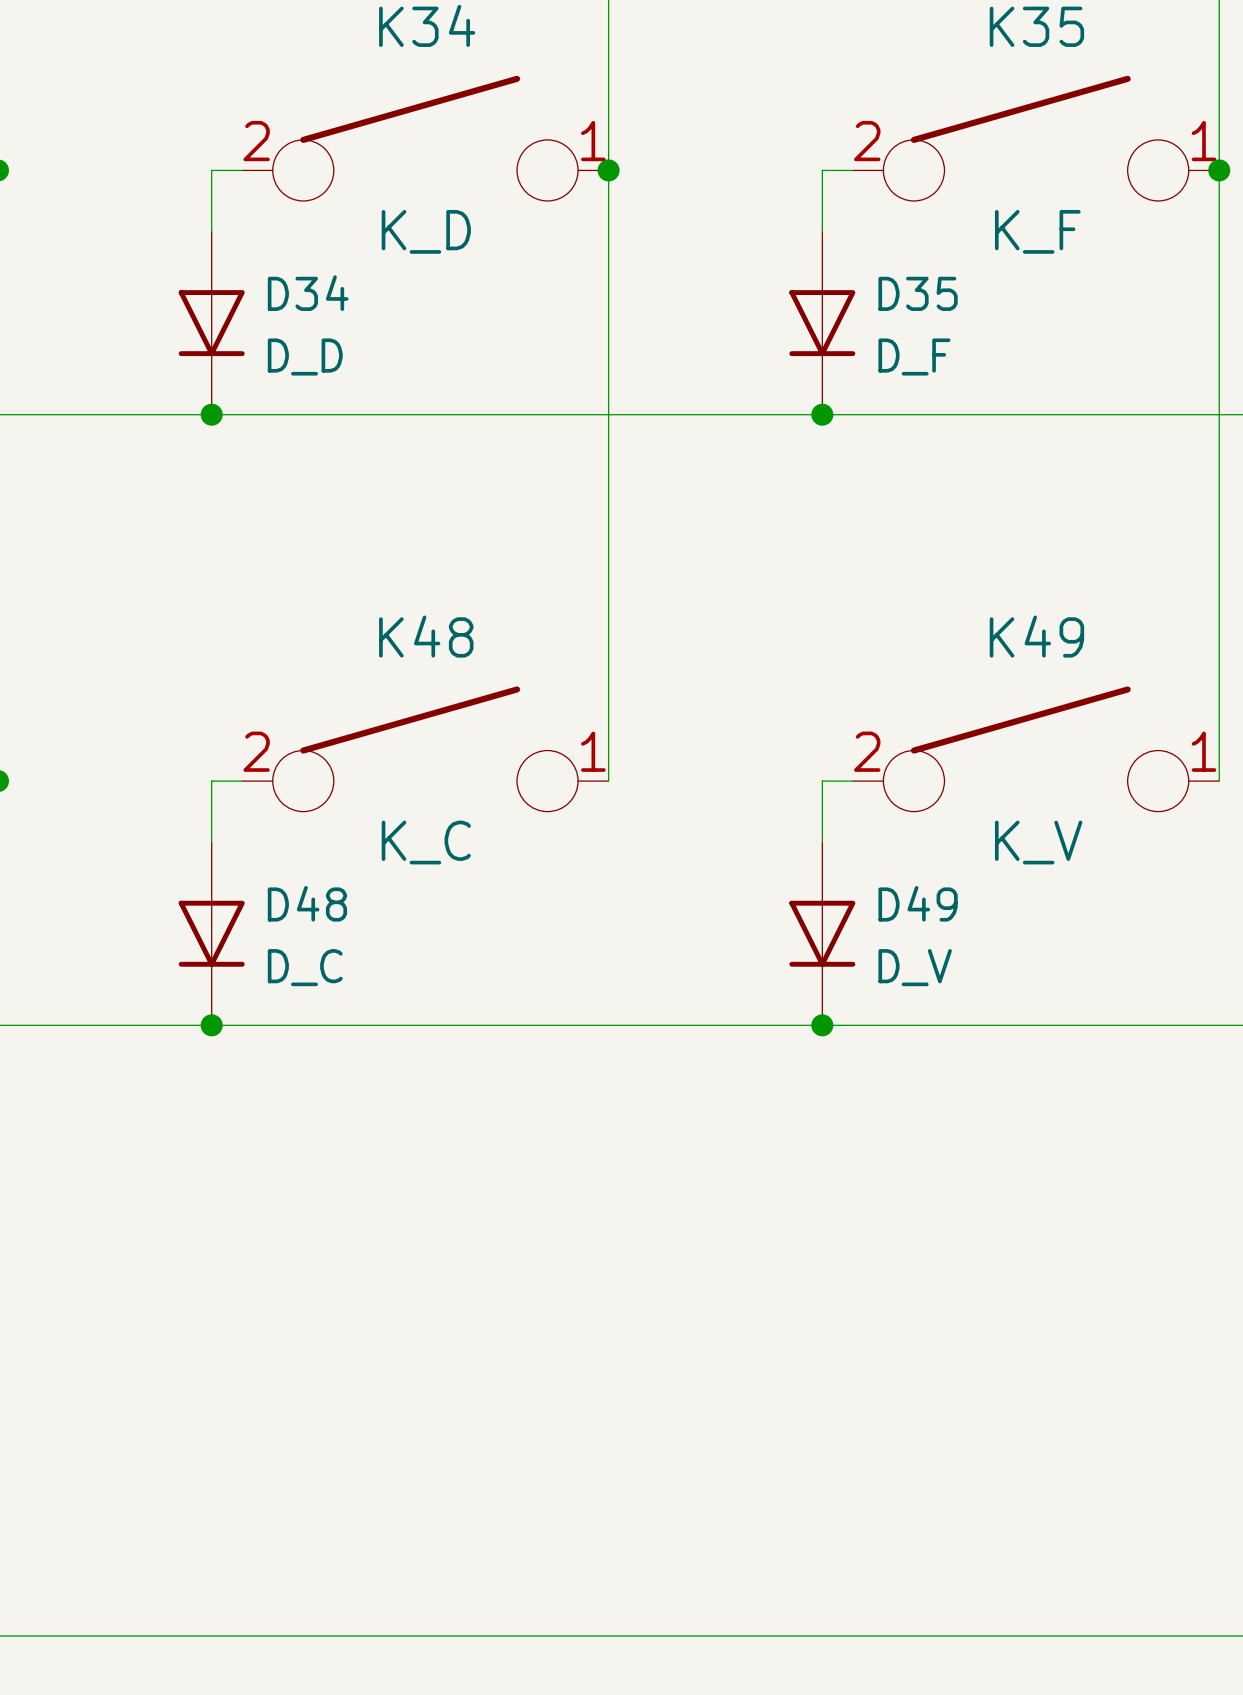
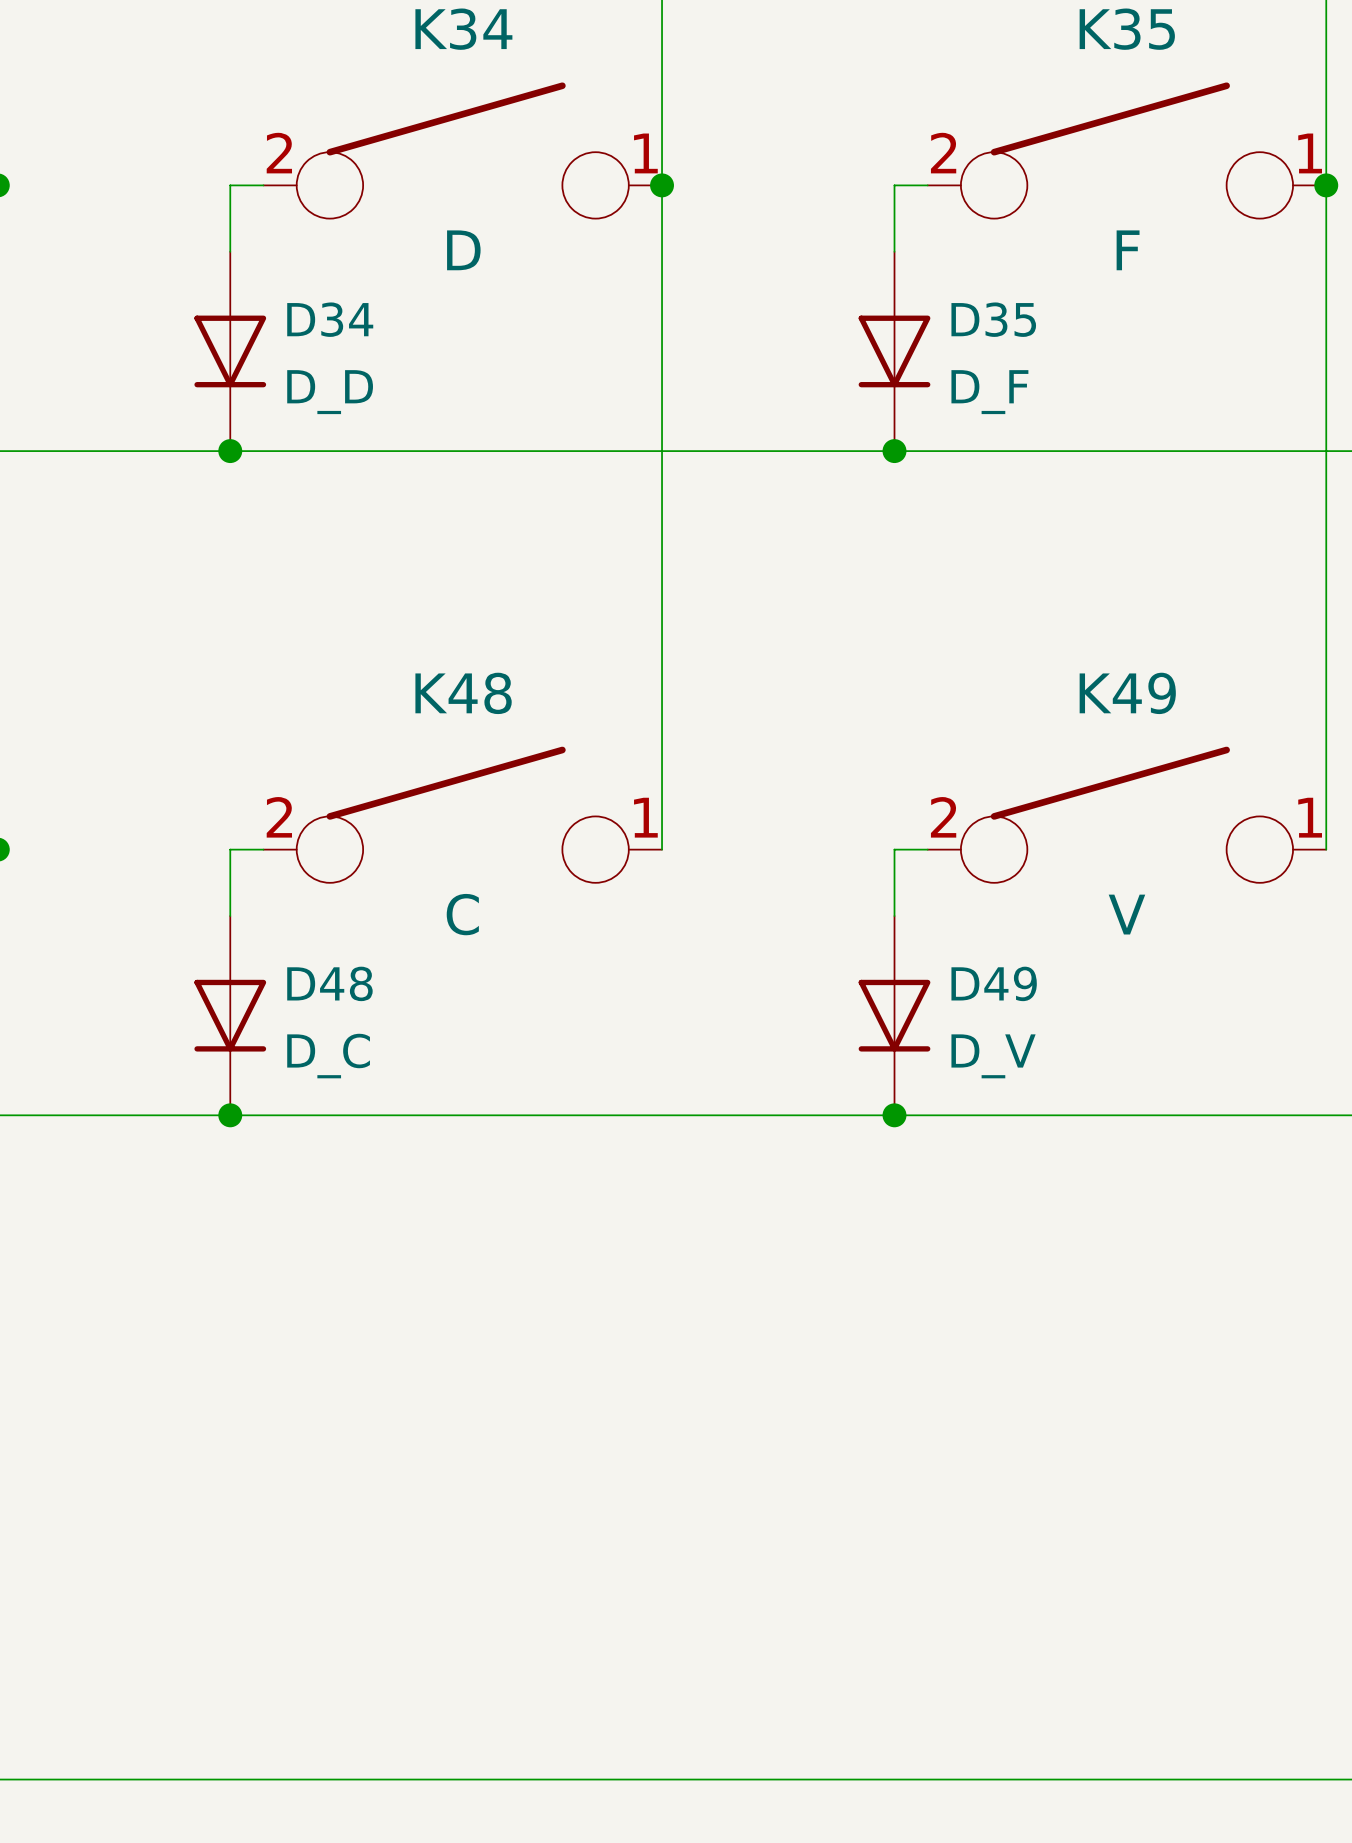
K34 value: K_D (426, 231) -> D (463, 250)
K35 value: K_F (1037, 231) -> F (1128, 250)
K48 value: K_C (426, 842) -> C (462, 914)
K49 value: K_V (1038, 842) -> V (1126, 914)

